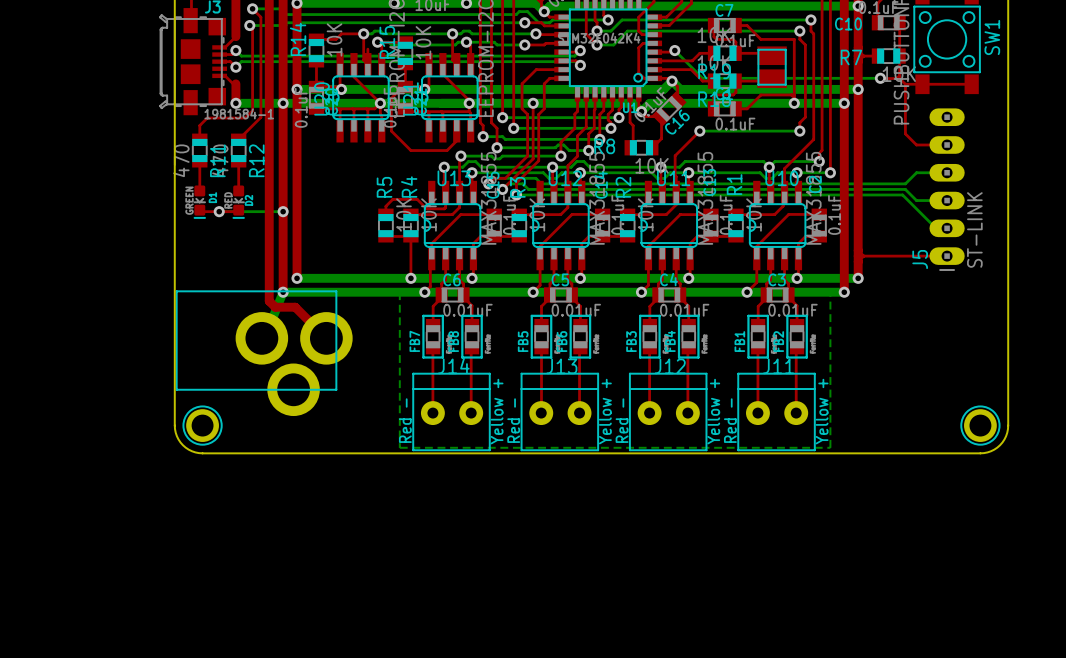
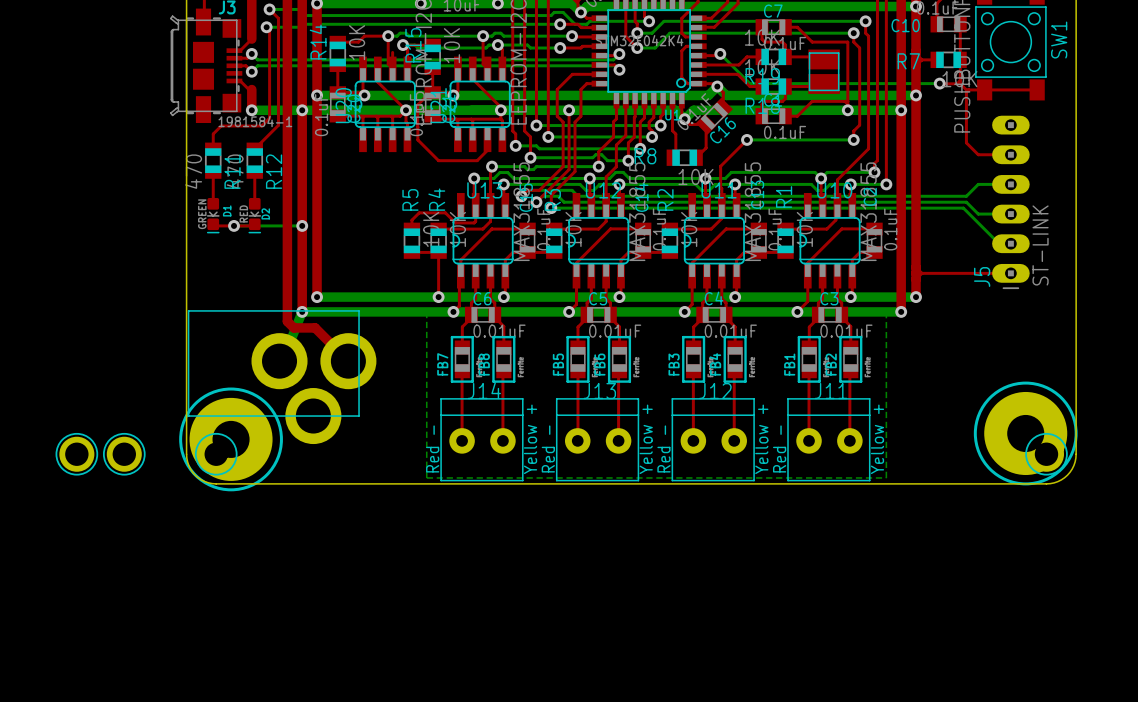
part: none -> (1025, 433)
part: none -> (231, 439)
part: none -> (76, 454)
part: none -> (124, 454)

